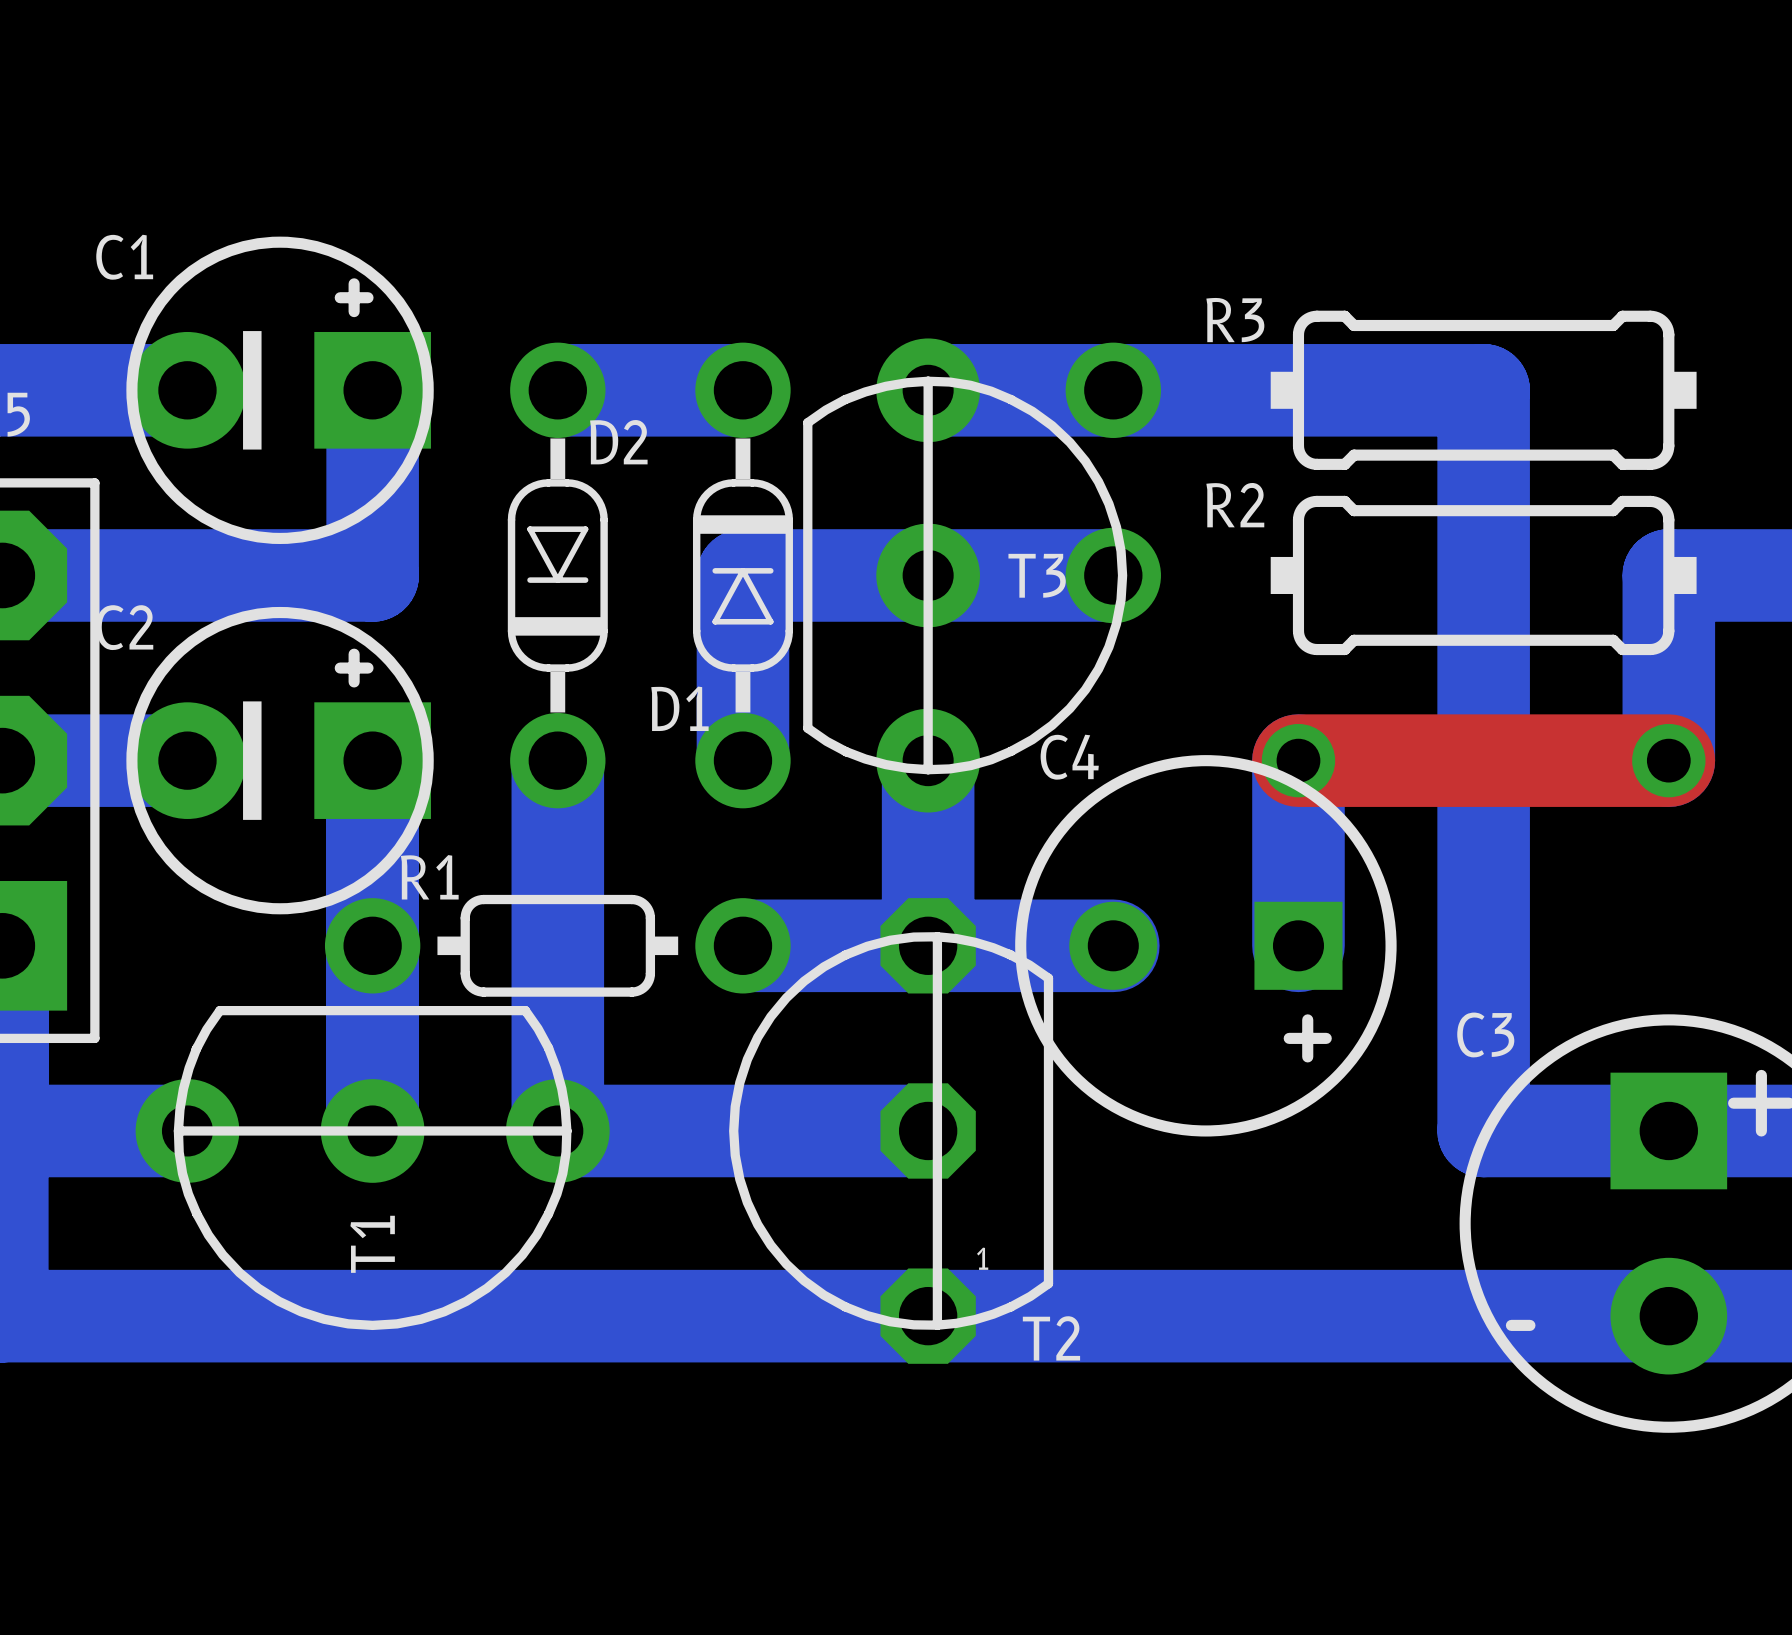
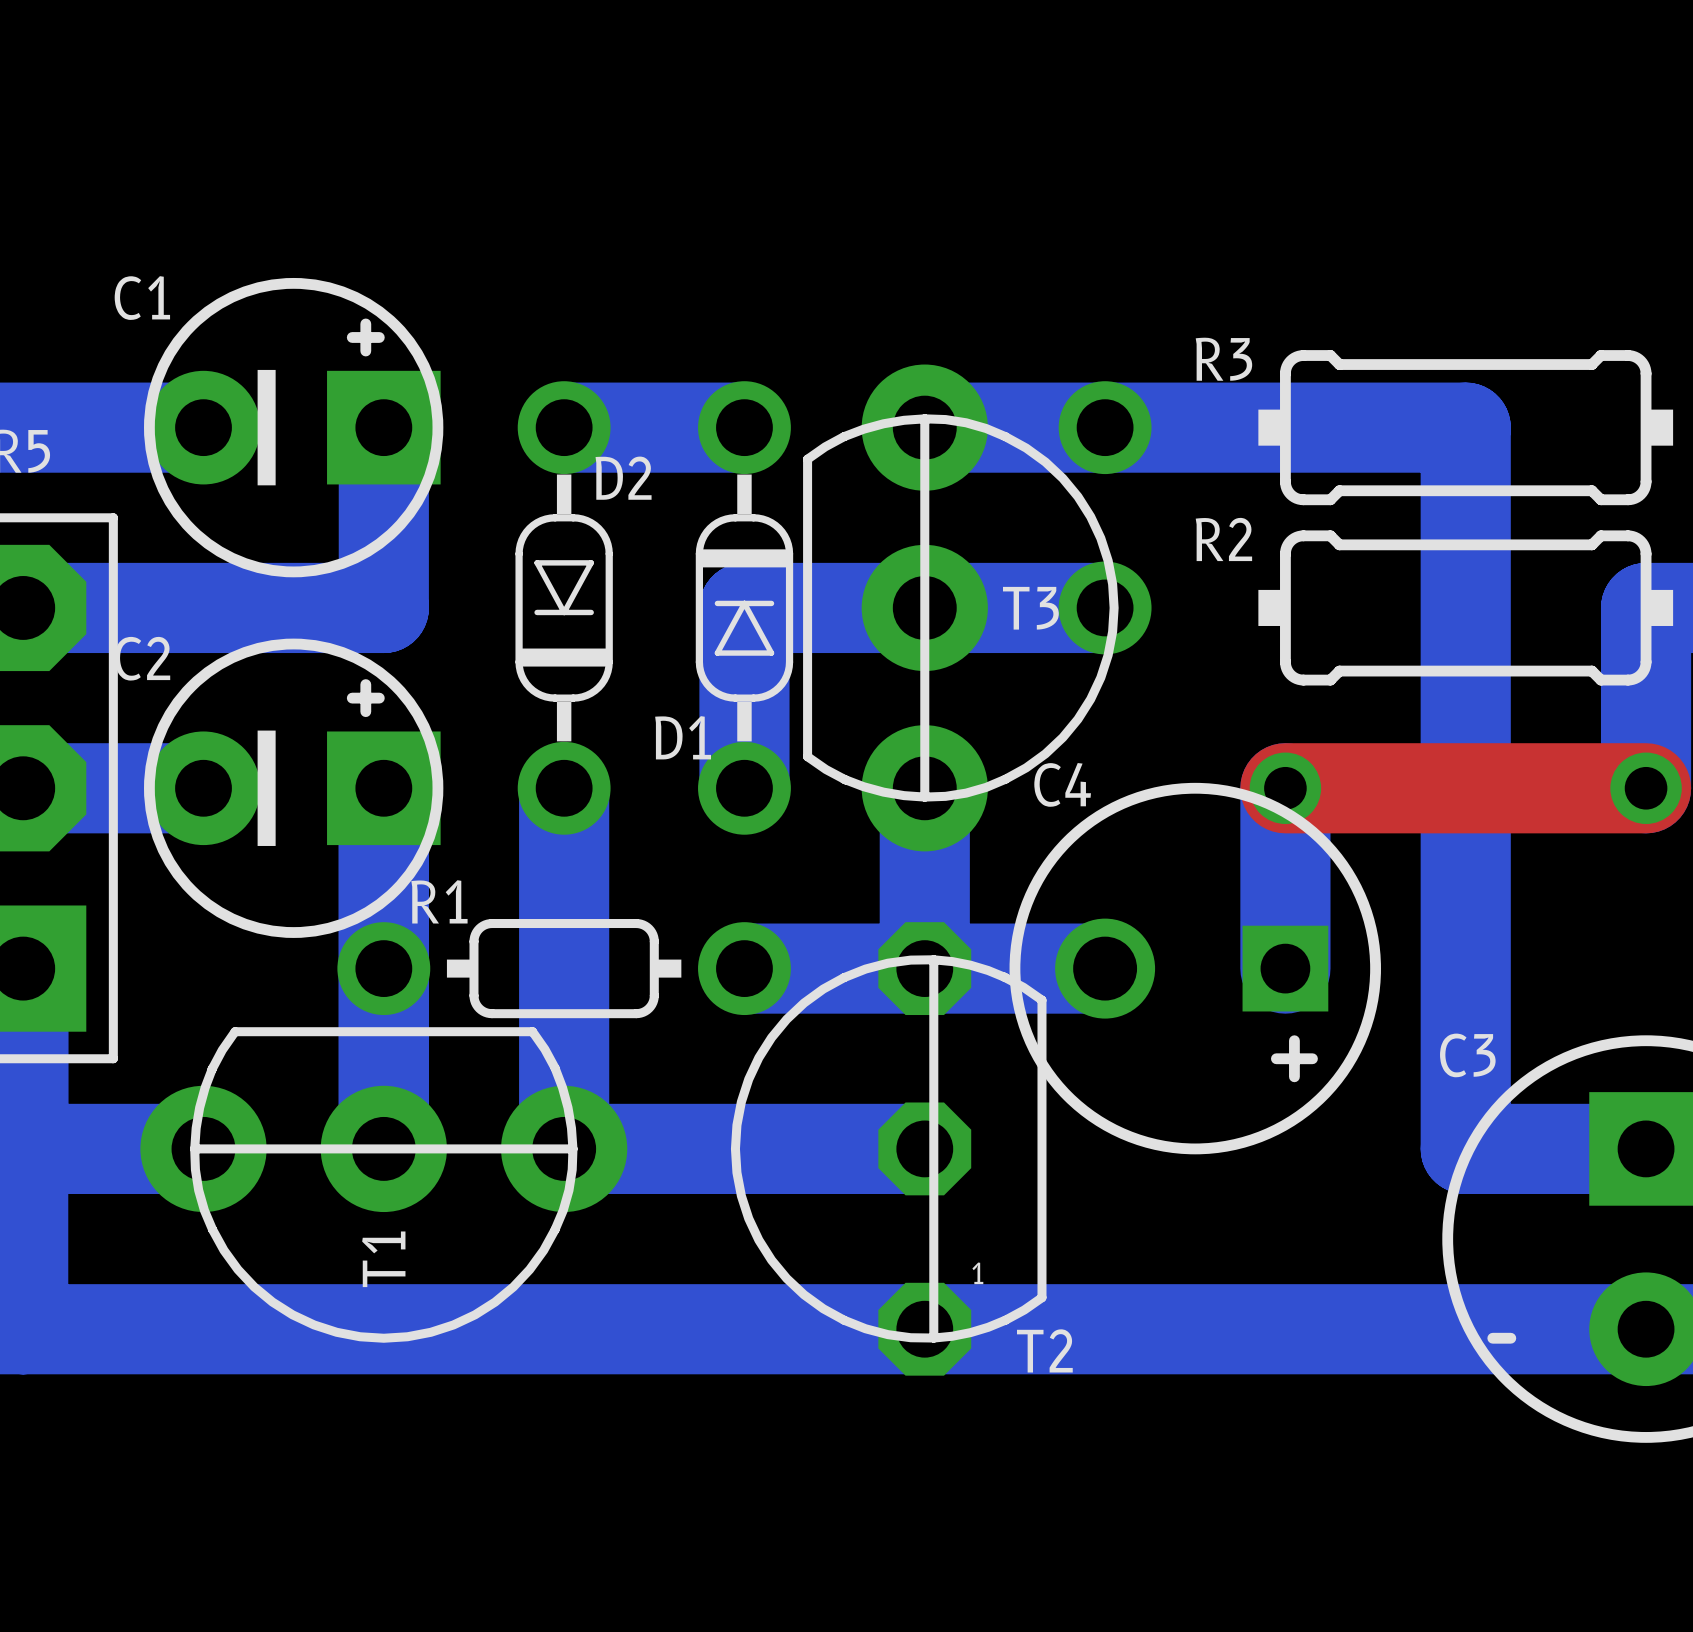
T3 footprint: [803, 338, 1128, 813] -> [803, 364, 1119, 852]
C4 footprint: [1015, 755, 1397, 1137] -> [1009, 782, 1381, 1155]
T1 footprint: [135, 1005, 610, 1331] -> [140, 1027, 628, 1343]

